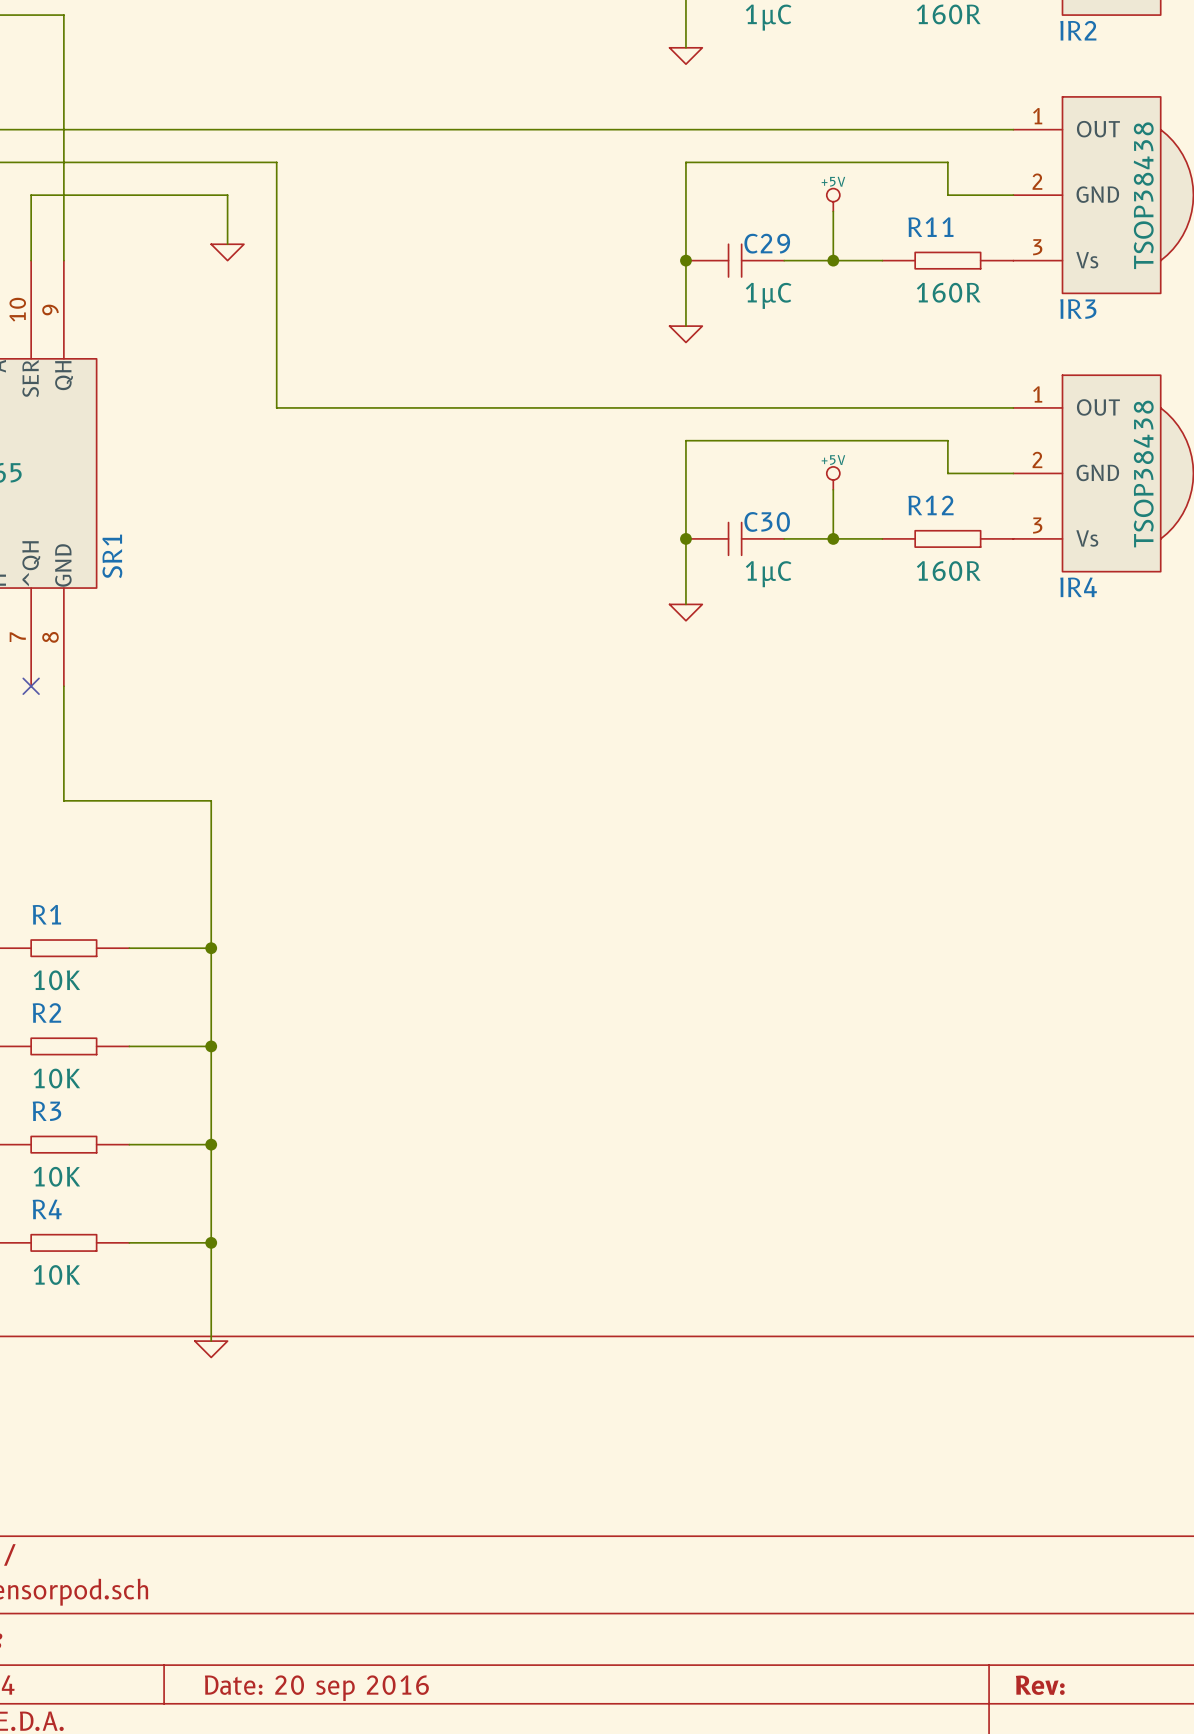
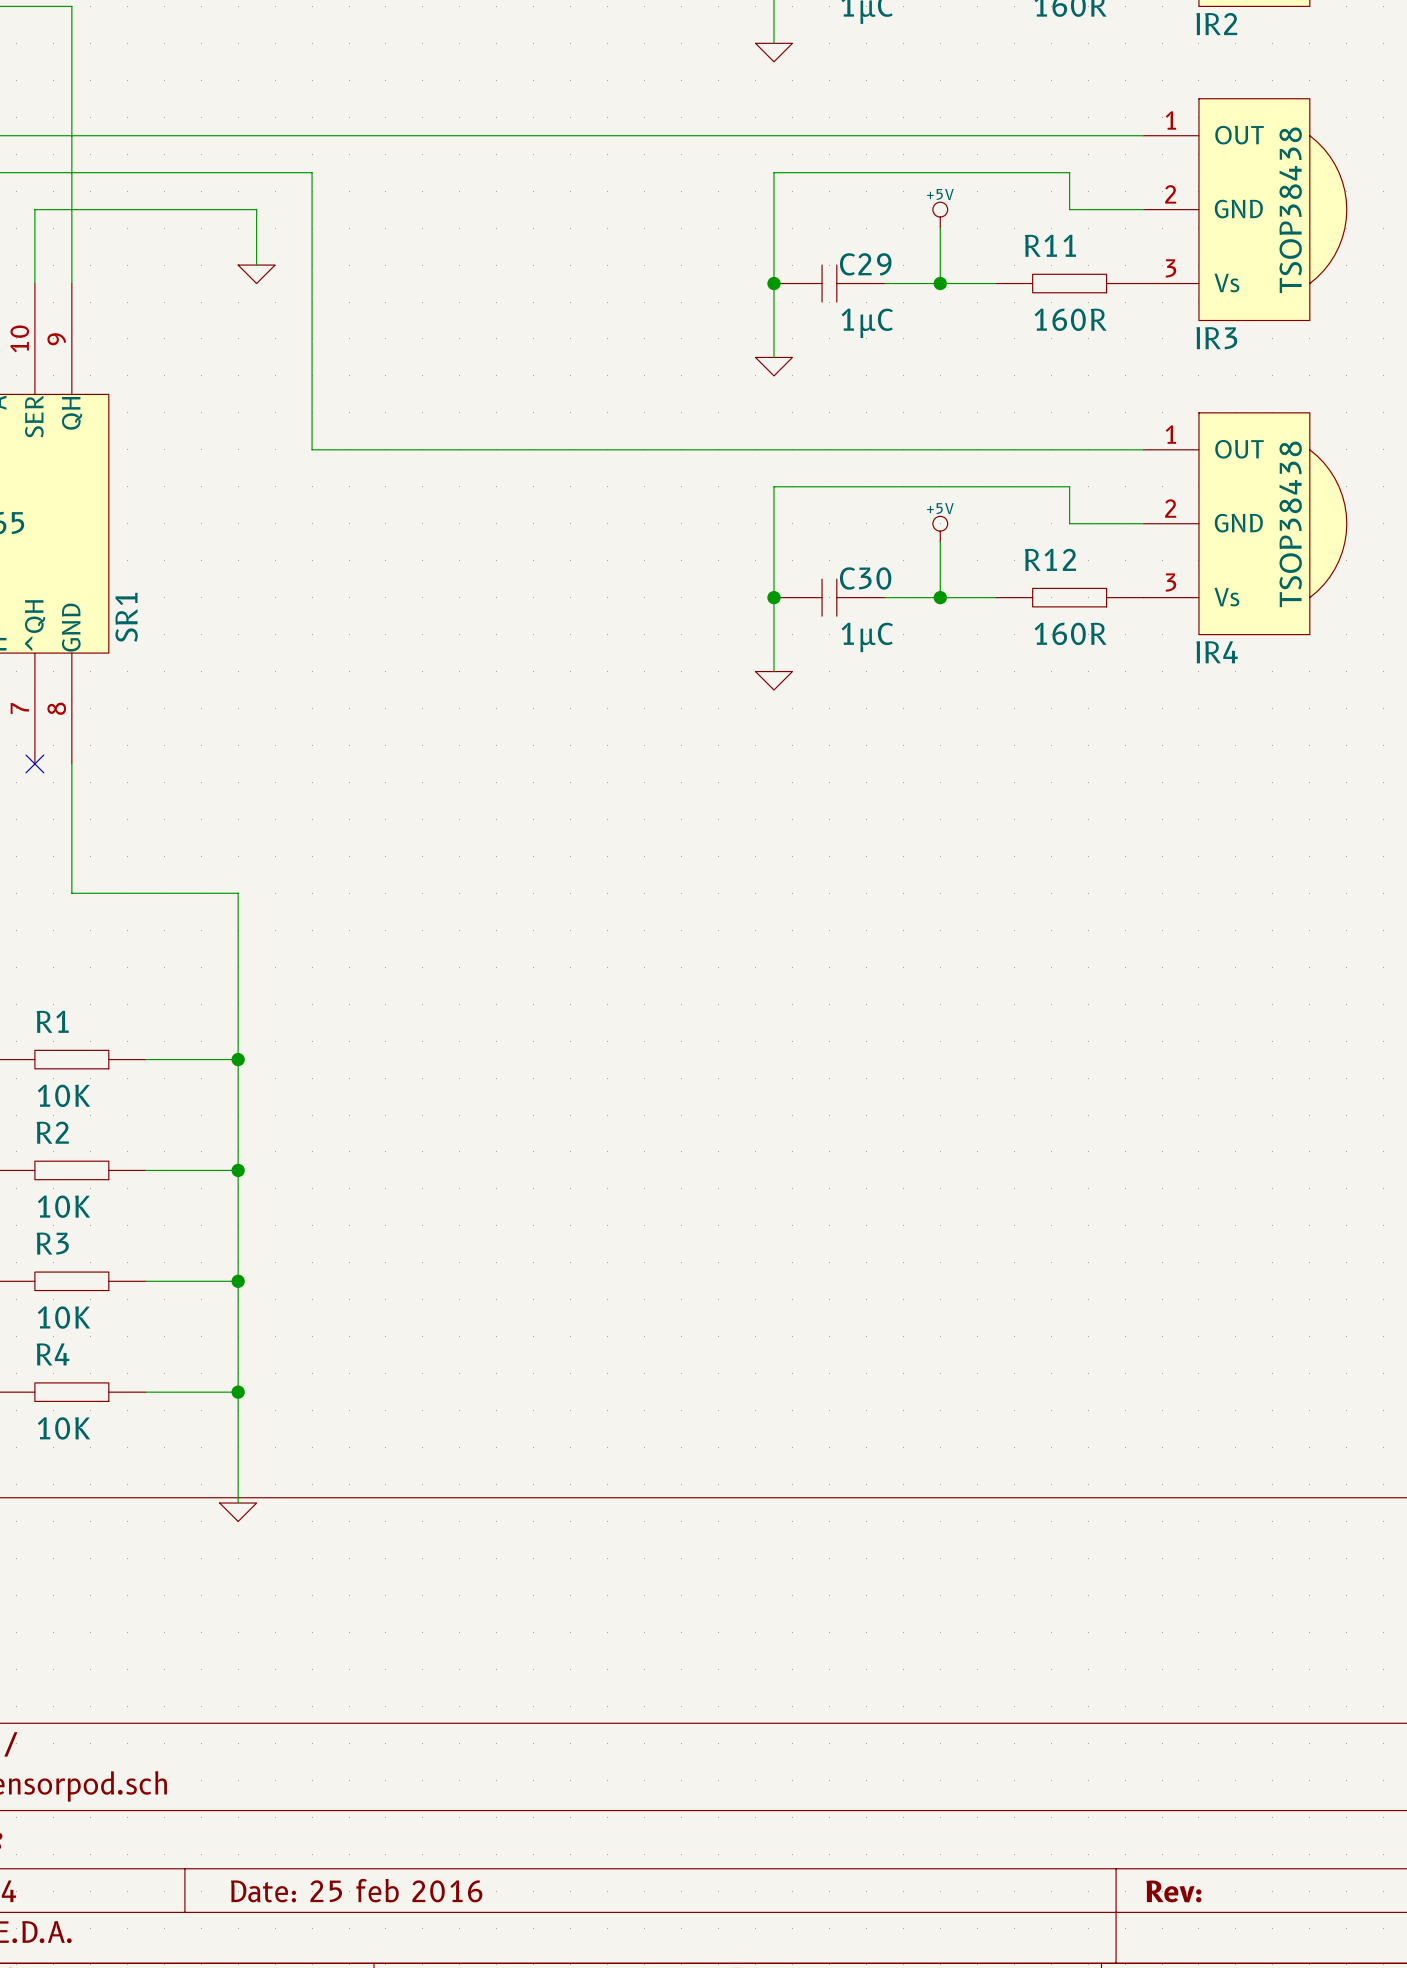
title block: Date: 20 sep 2016 (316, 1688) -> Date: 25 feb 2016 (356, 1890)

